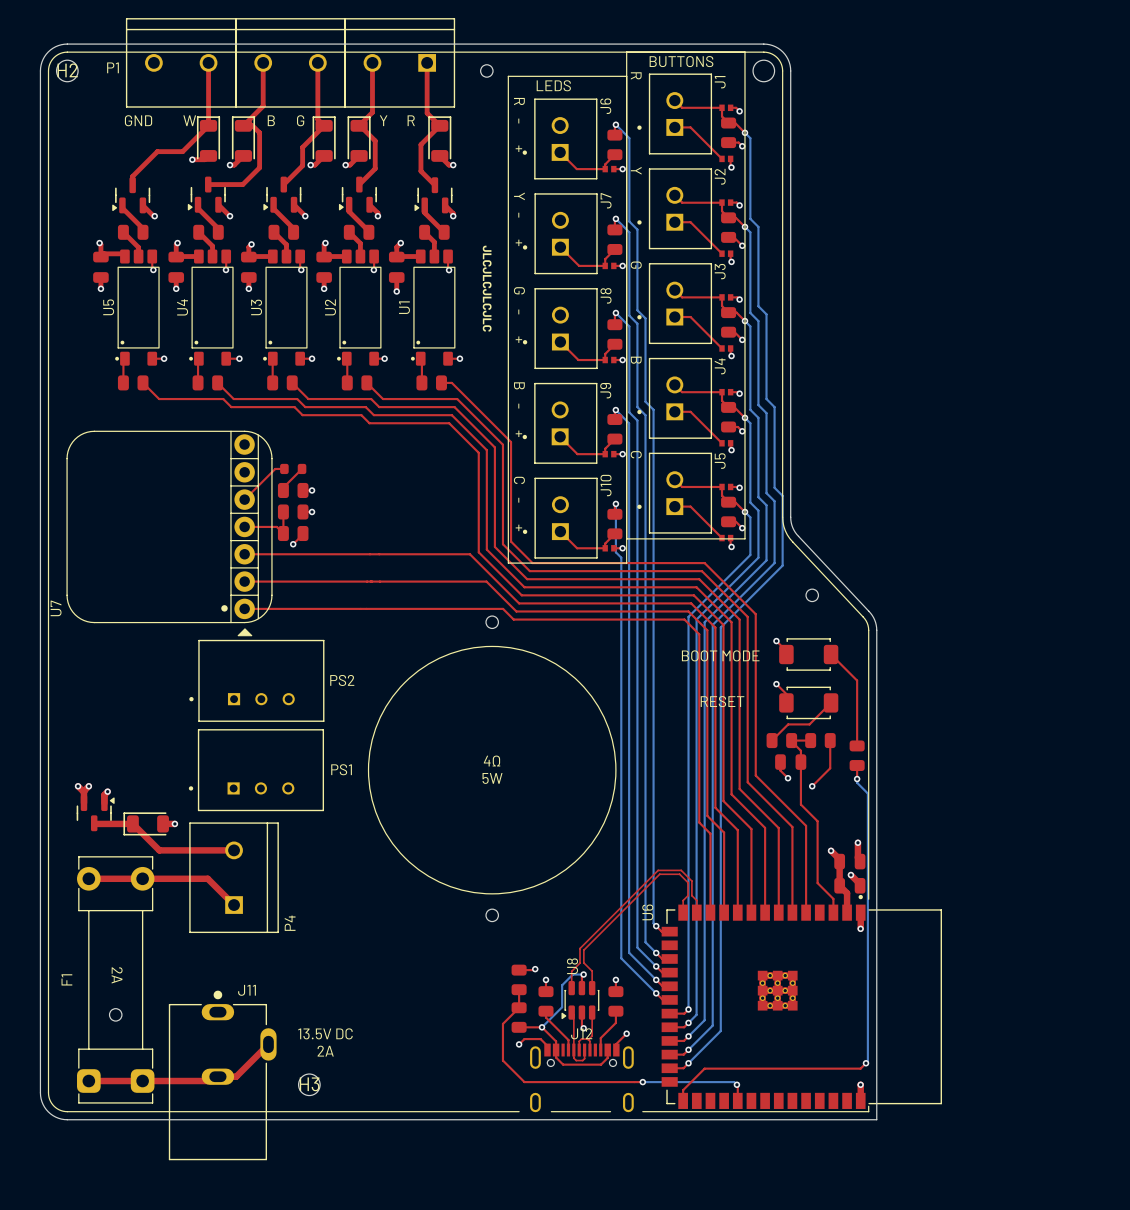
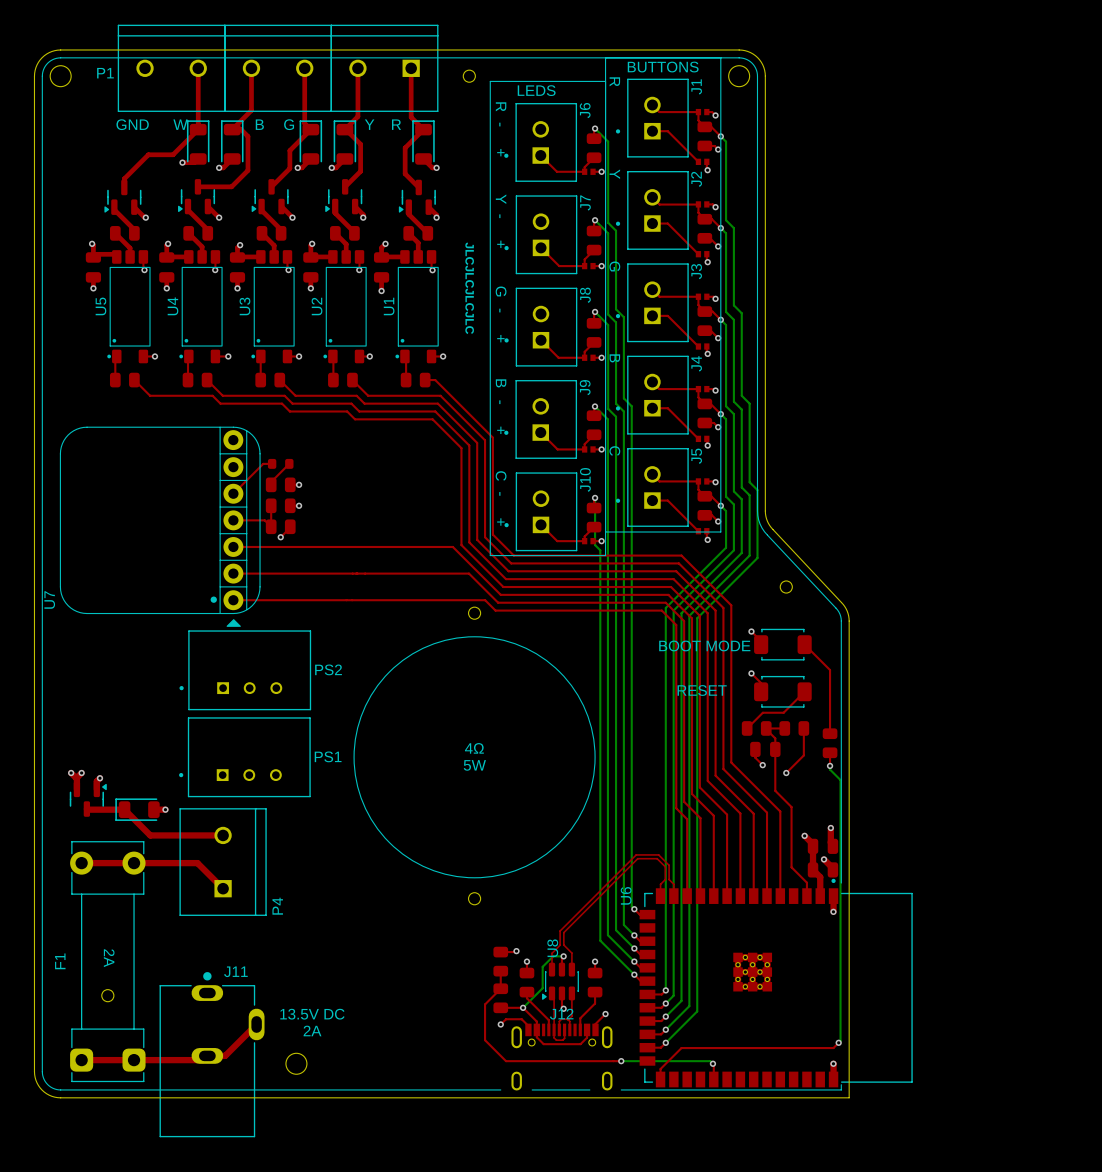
H2 name: H2 (67, 70) -> none
H3 name: H3 (309, 1084) -> none

